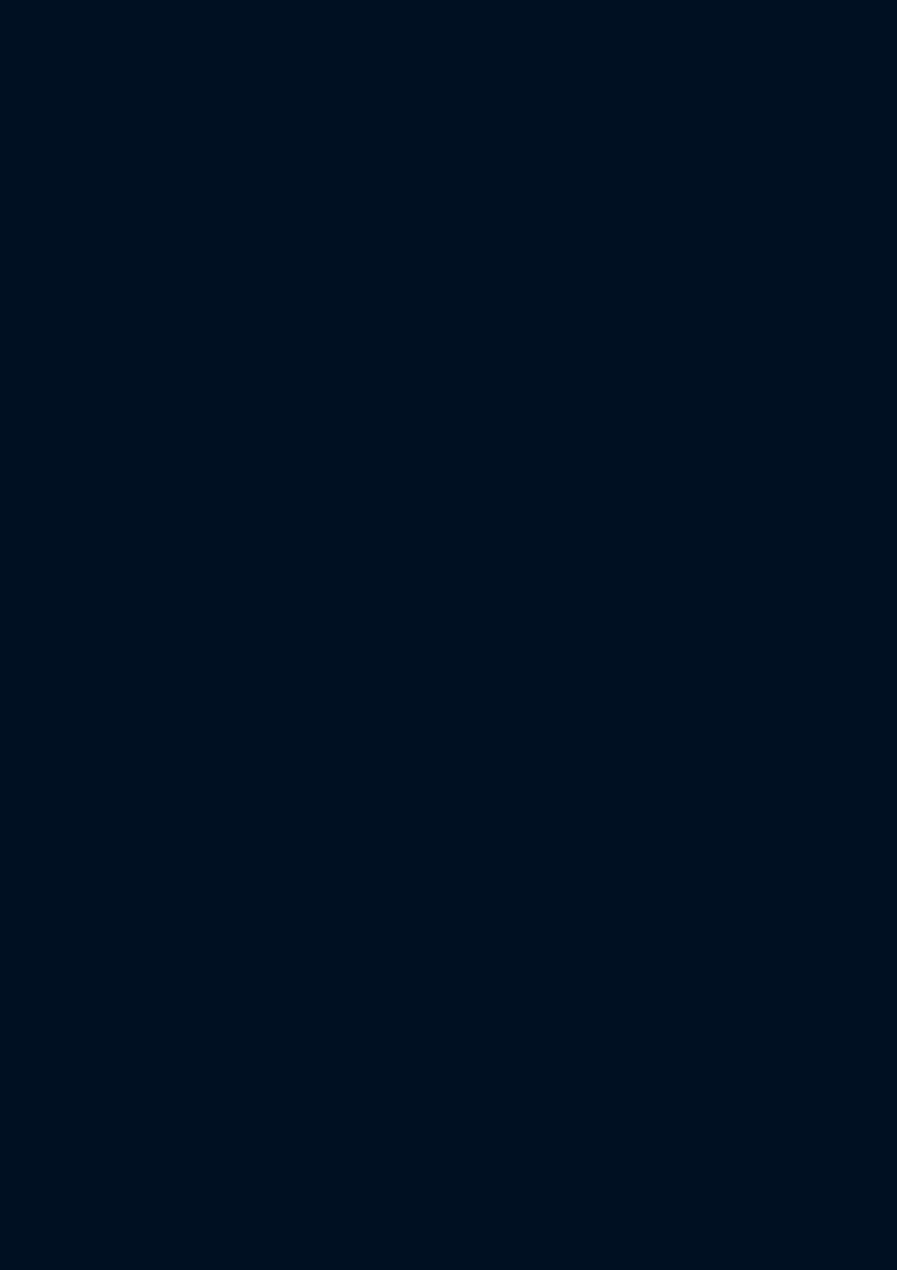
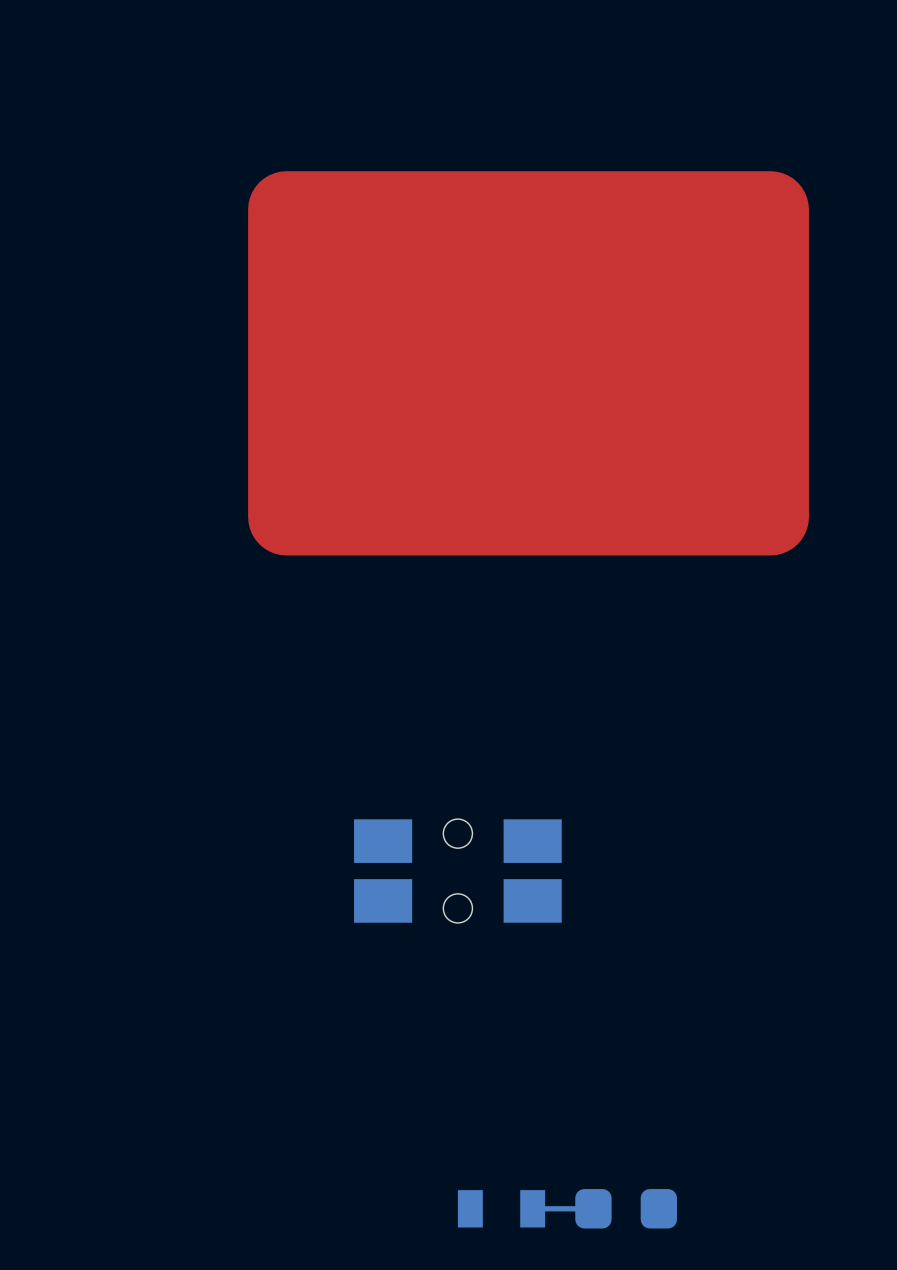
part: none -> (528, 363)
part: none -> (457, 871)
part: none -> (501, 1208)
bottom track: none -> (532, 1208) (593, 1208)
part: none -> (626, 1208)

